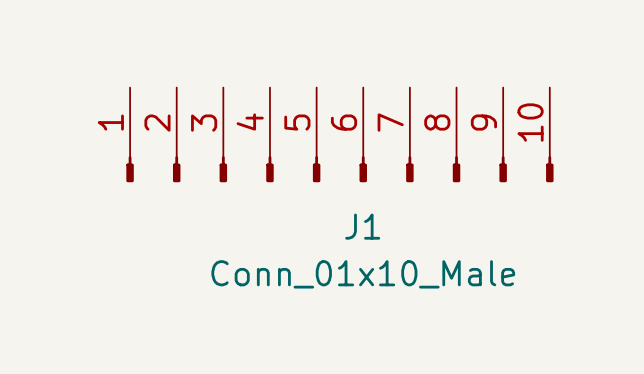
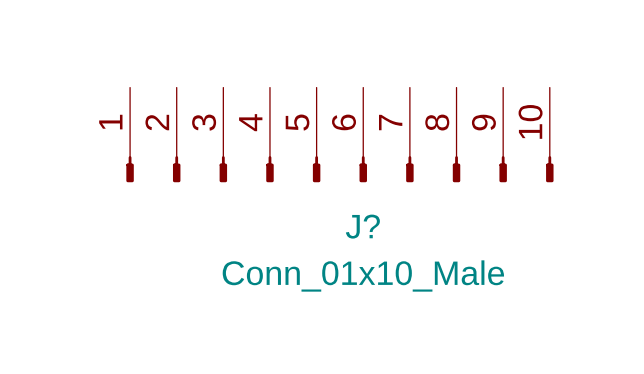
J1 name: J1 (362, 226) -> J? (362, 226)

